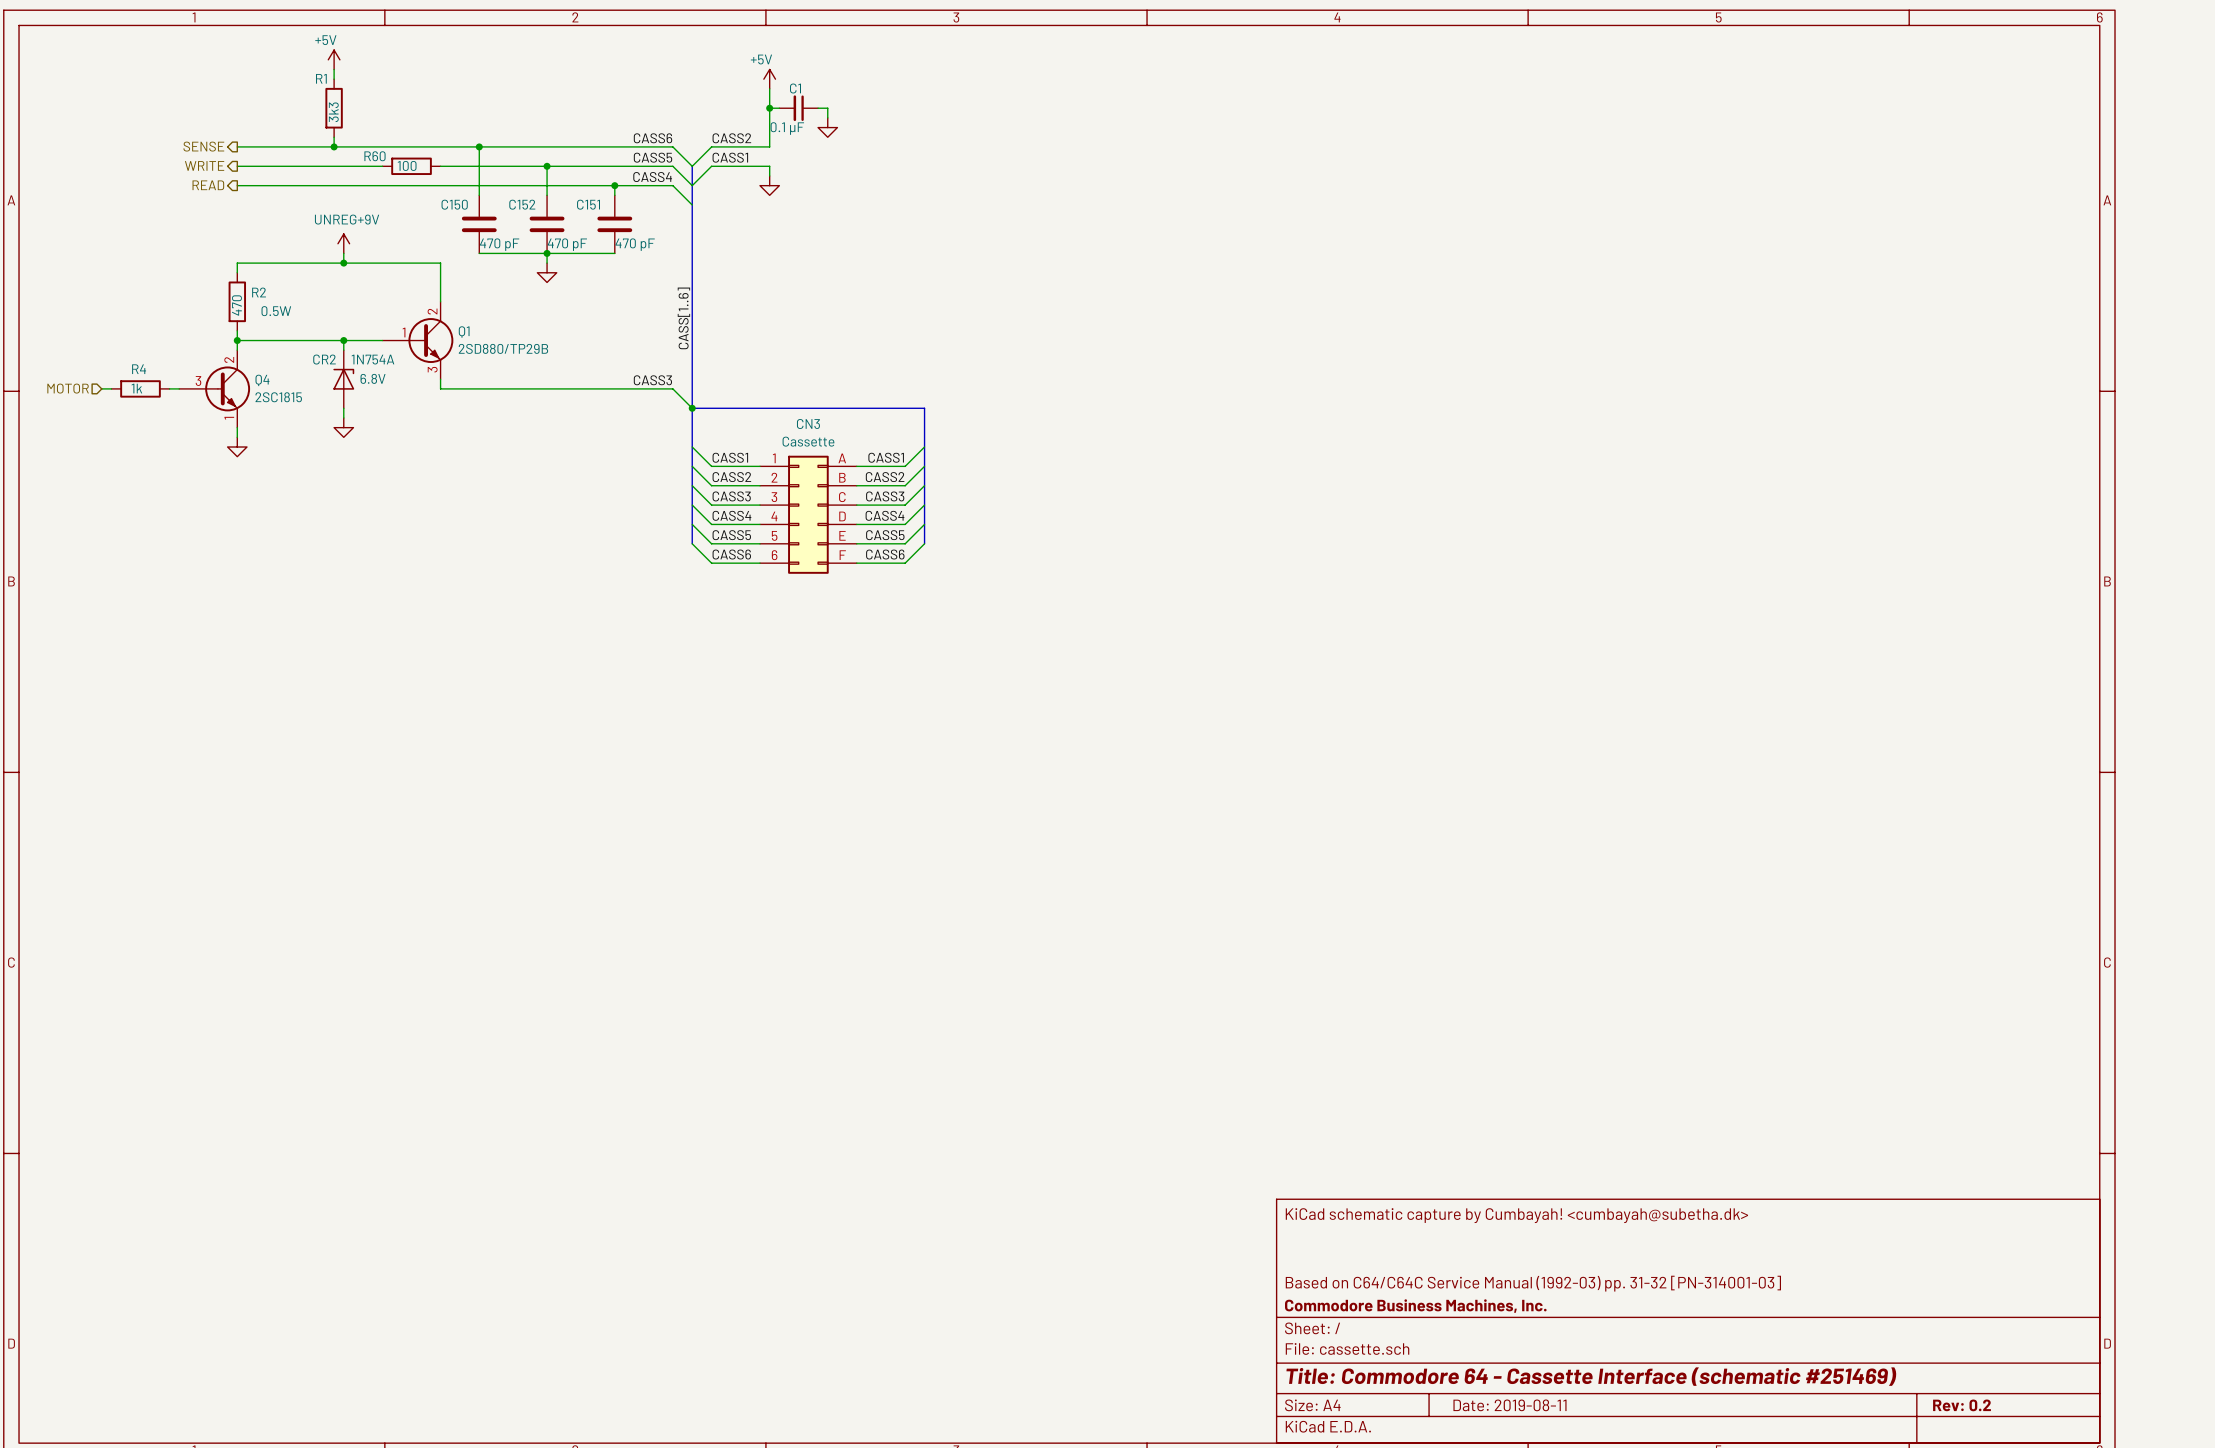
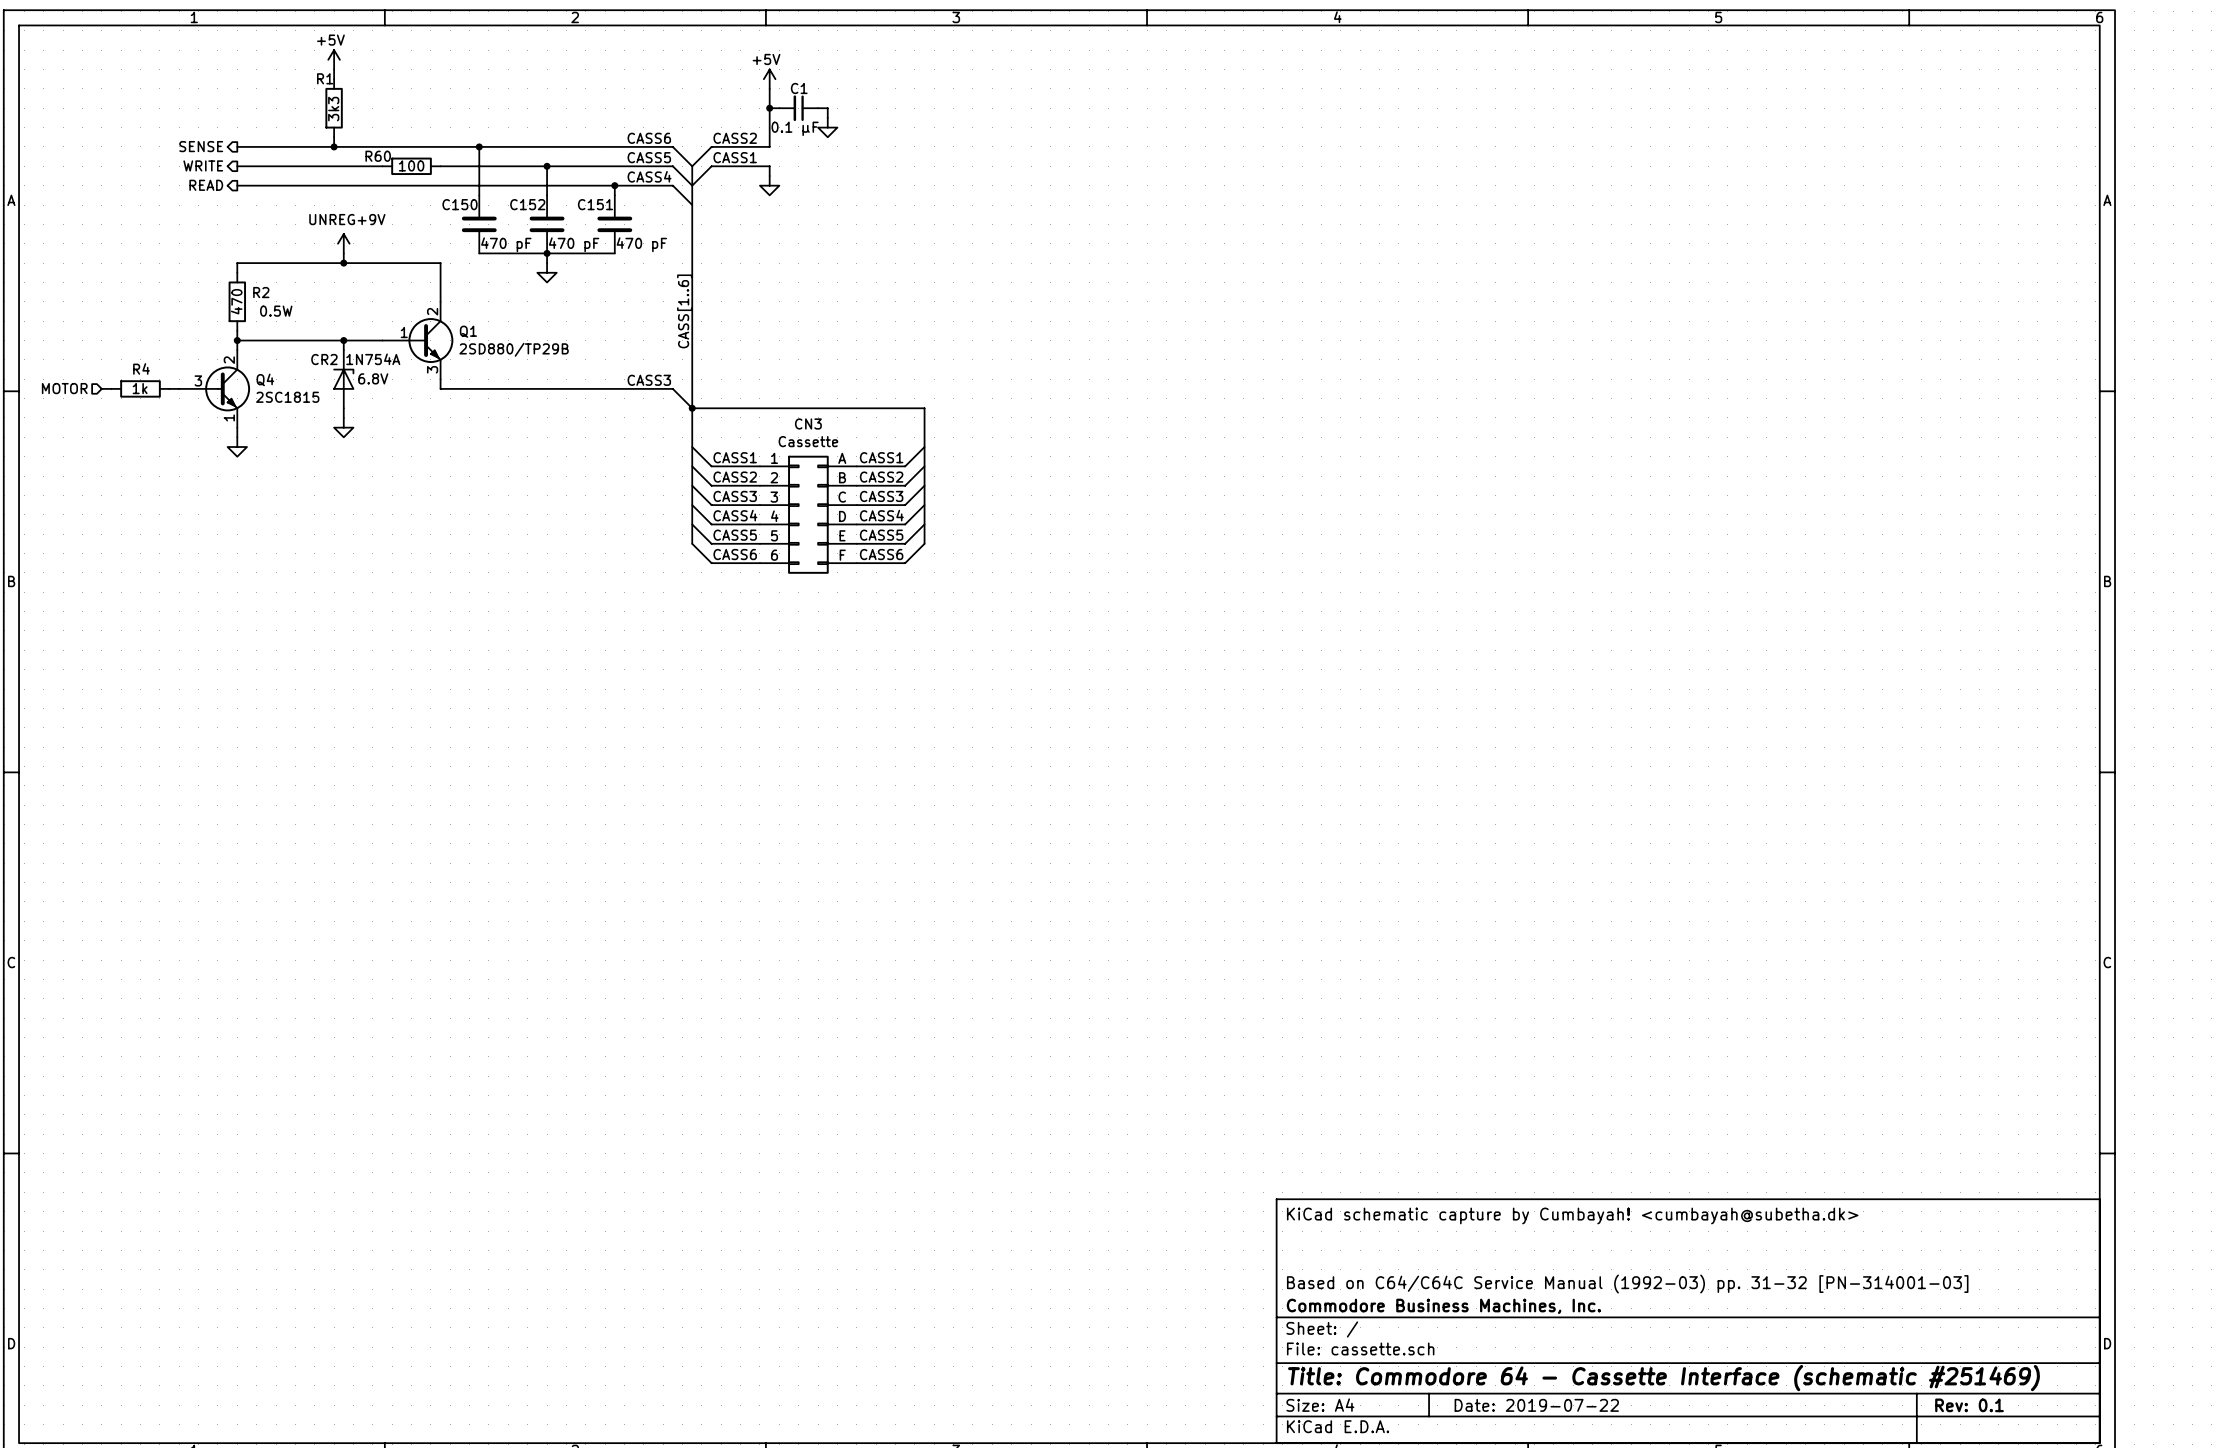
title block: Date: 2019-08-11 (1509, 1405) -> Date: 2019-07-22 (1536, 1405)
title block: Rev: 0.2 (1962, 1405) -> Rev: 0.1 (1969, 1405)

